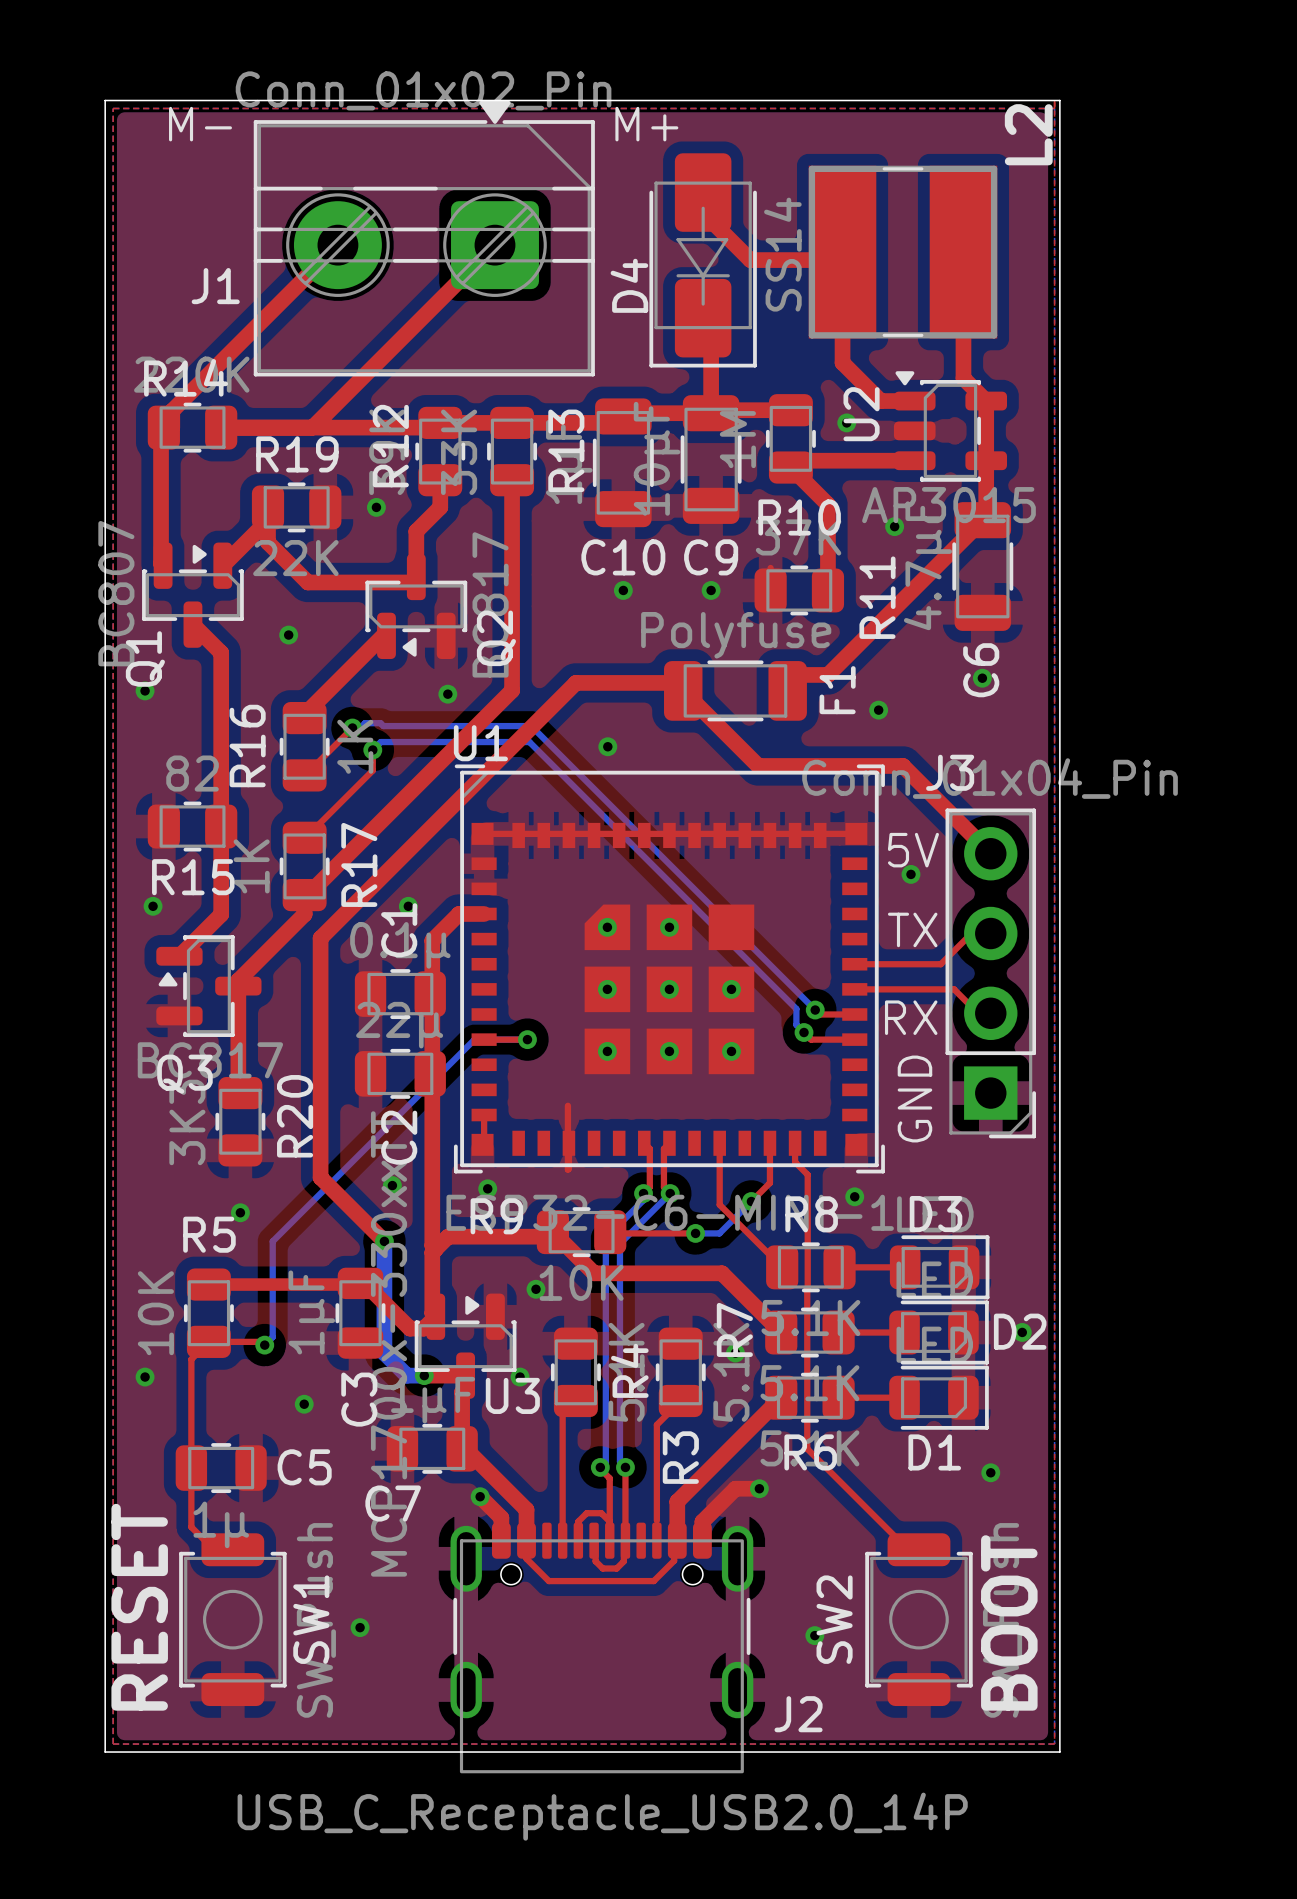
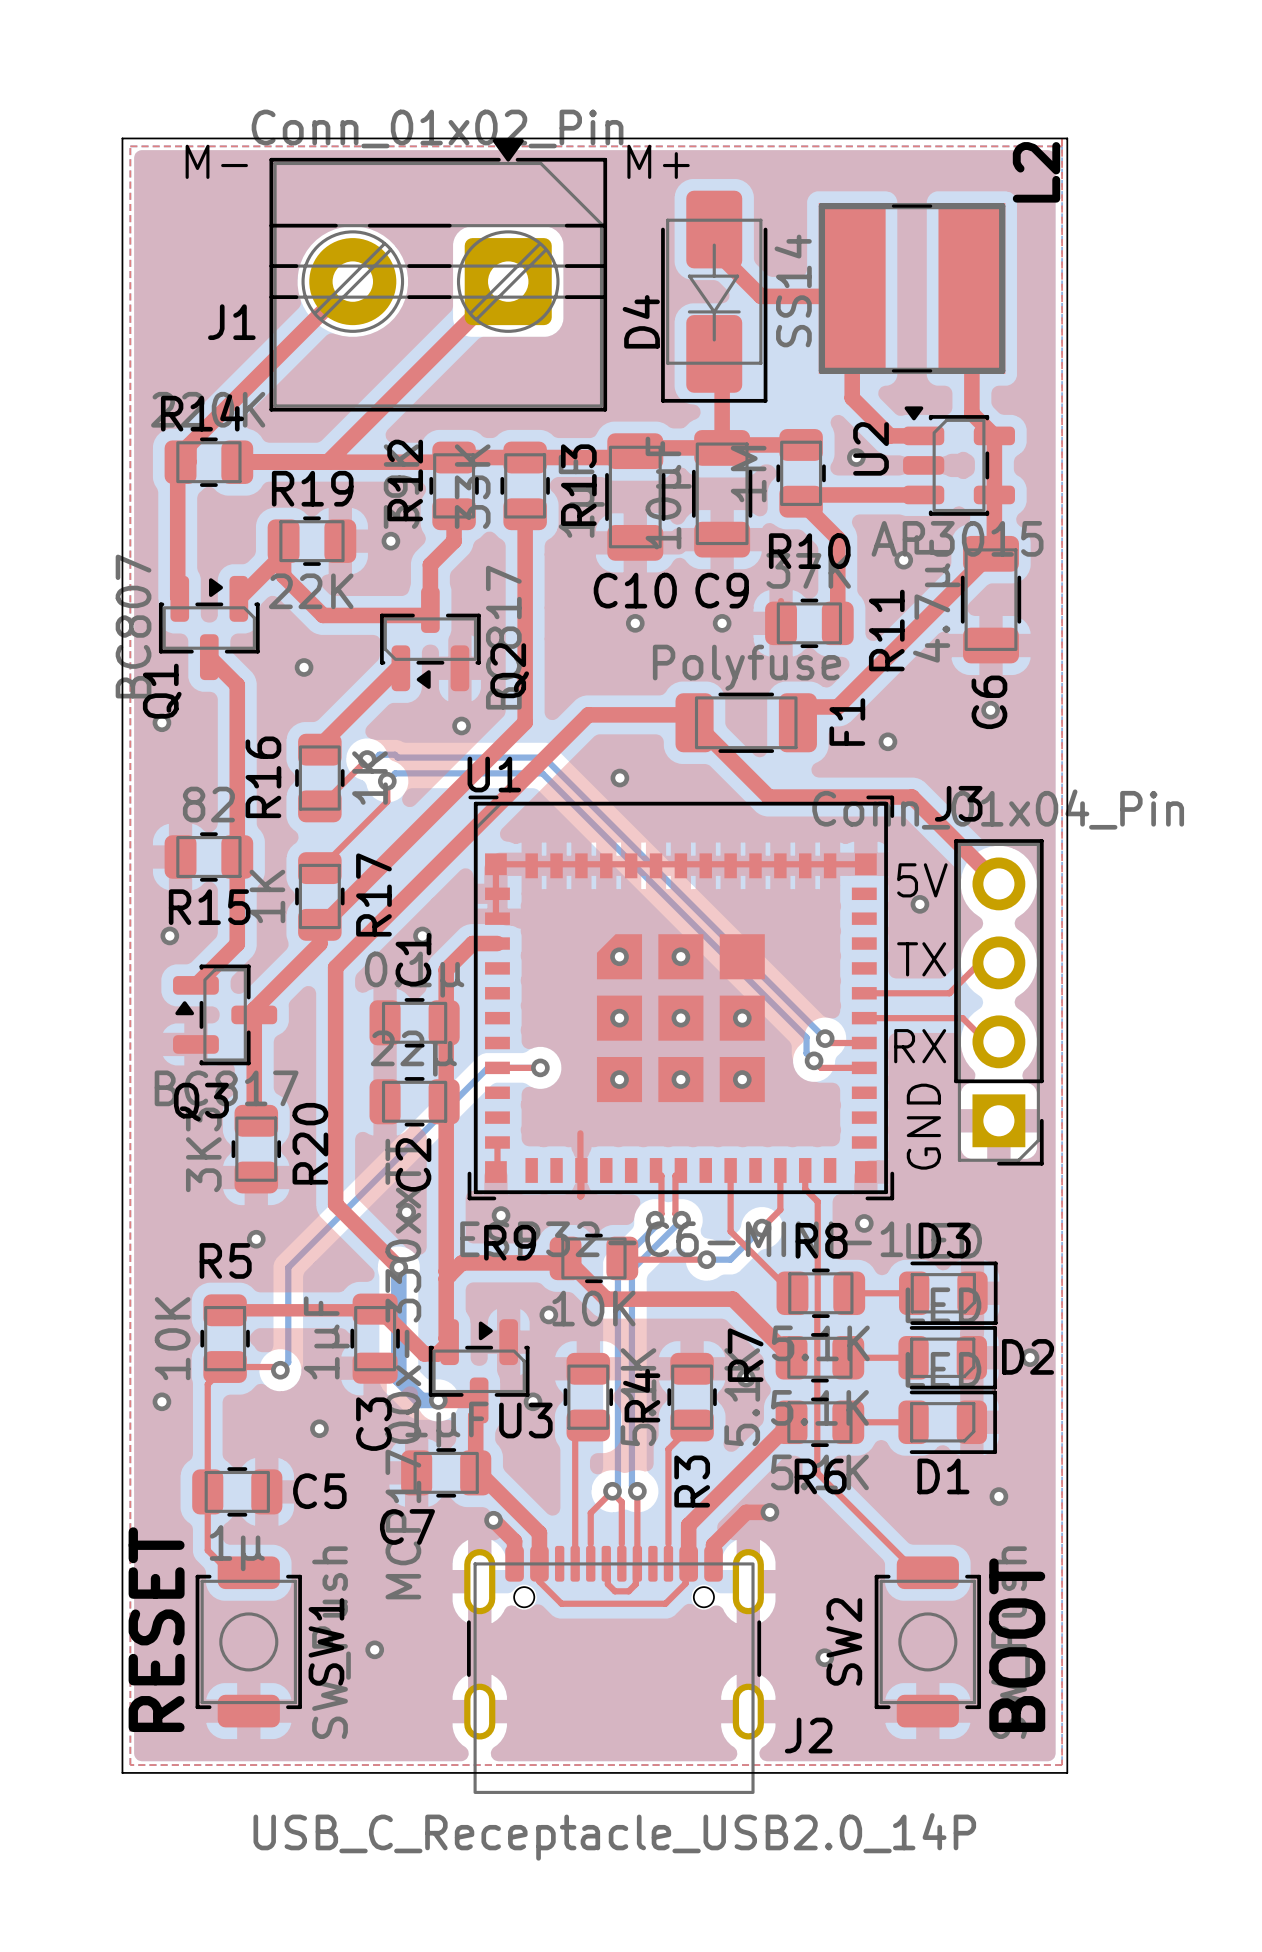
top track: none -> (495, 864) (495, 917)
top track: none -> (612, 1491) (590, 1513) (590, 1543)
top track: (609, 1521) (601, 1513) (586, 1513) (578, 1521) (578, 1540) -> none

